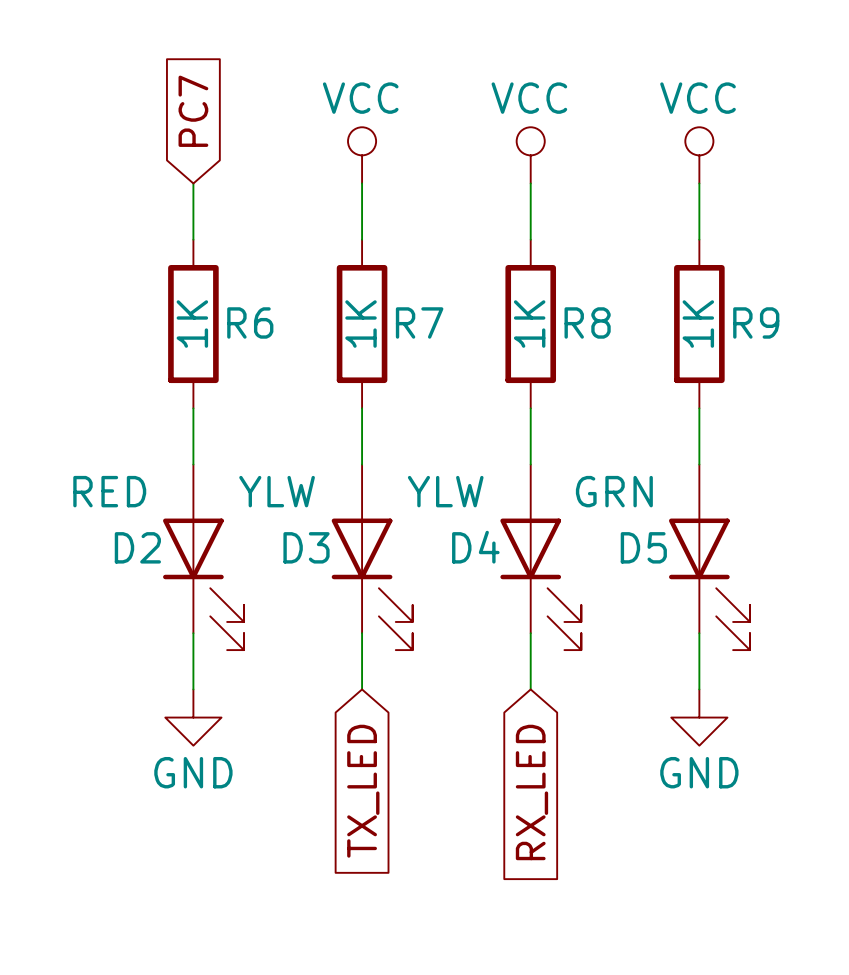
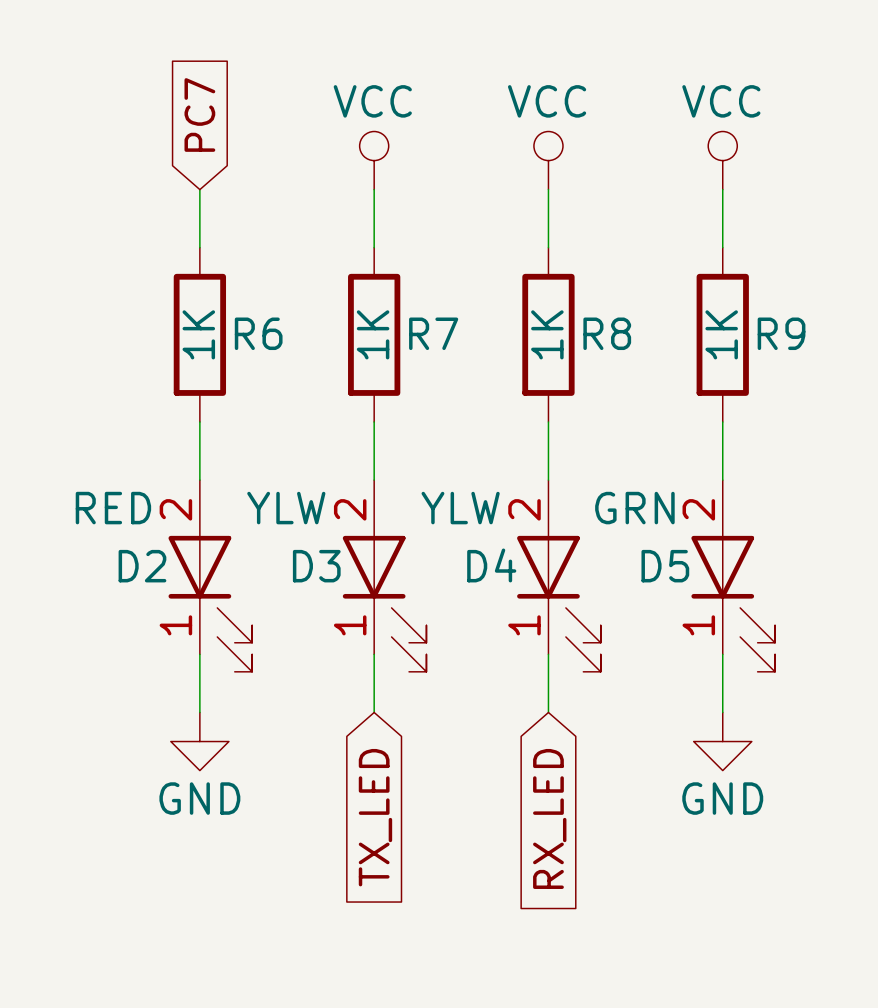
D2 pin number: none -> 2 (175, 509)
D3 pin number: none -> 2 (350, 509)
D4 pin number: none -> 2 (524, 509)
D5 pin number: none -> 2 (698, 509)
D2 pin number: none -> 1 (175, 625)
D3 pin number: none -> 1 (350, 625)
D4 pin number: none -> 1 (524, 625)
D5 pin number: none -> 1 (698, 625)

